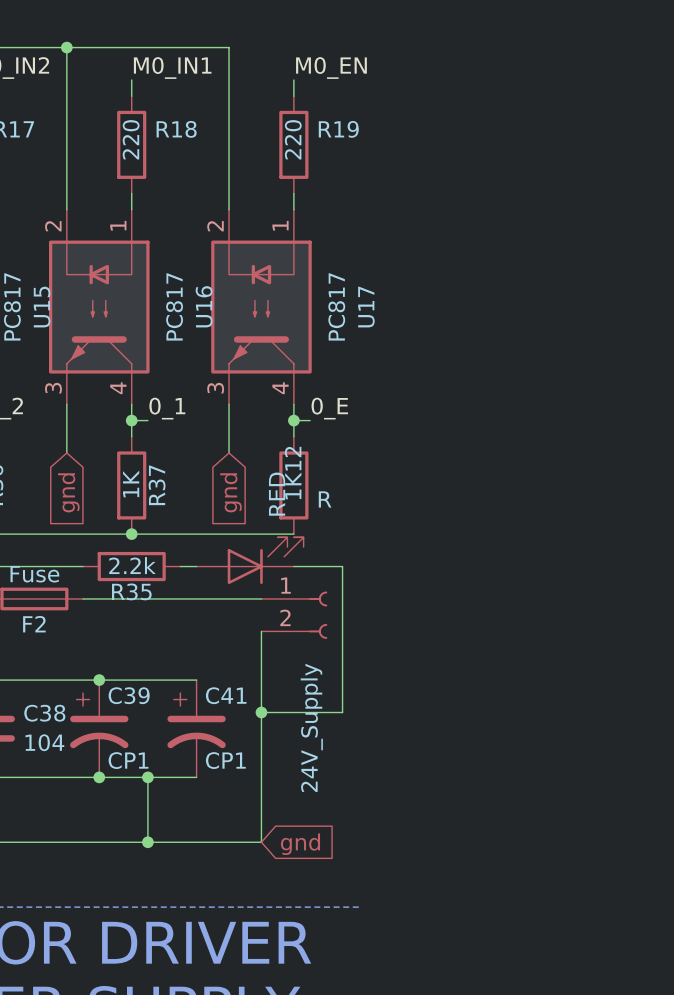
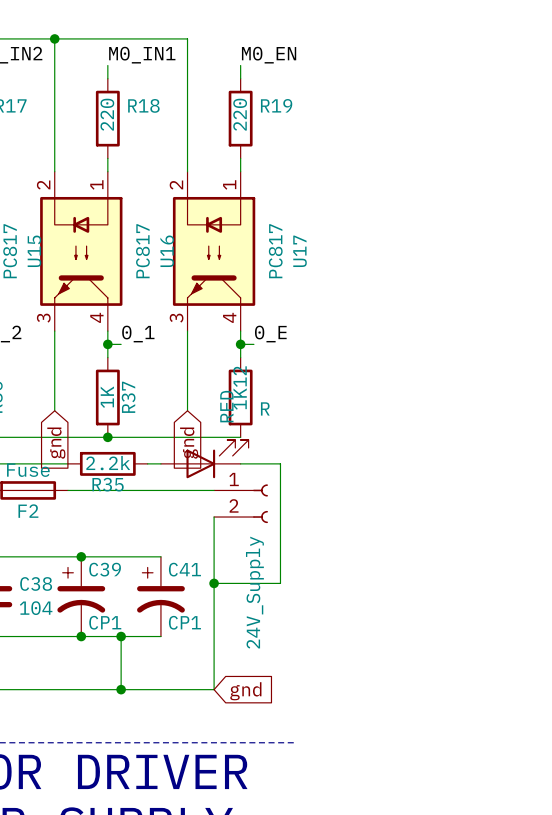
wire: none -> (54, 370) (54, 410)
wire: none -> (187, 370) (187, 410)
global label position: gnd (68, 492) -> gnd (56, 443)
global label position: gnd (230, 492) -> gnd (189, 443)

